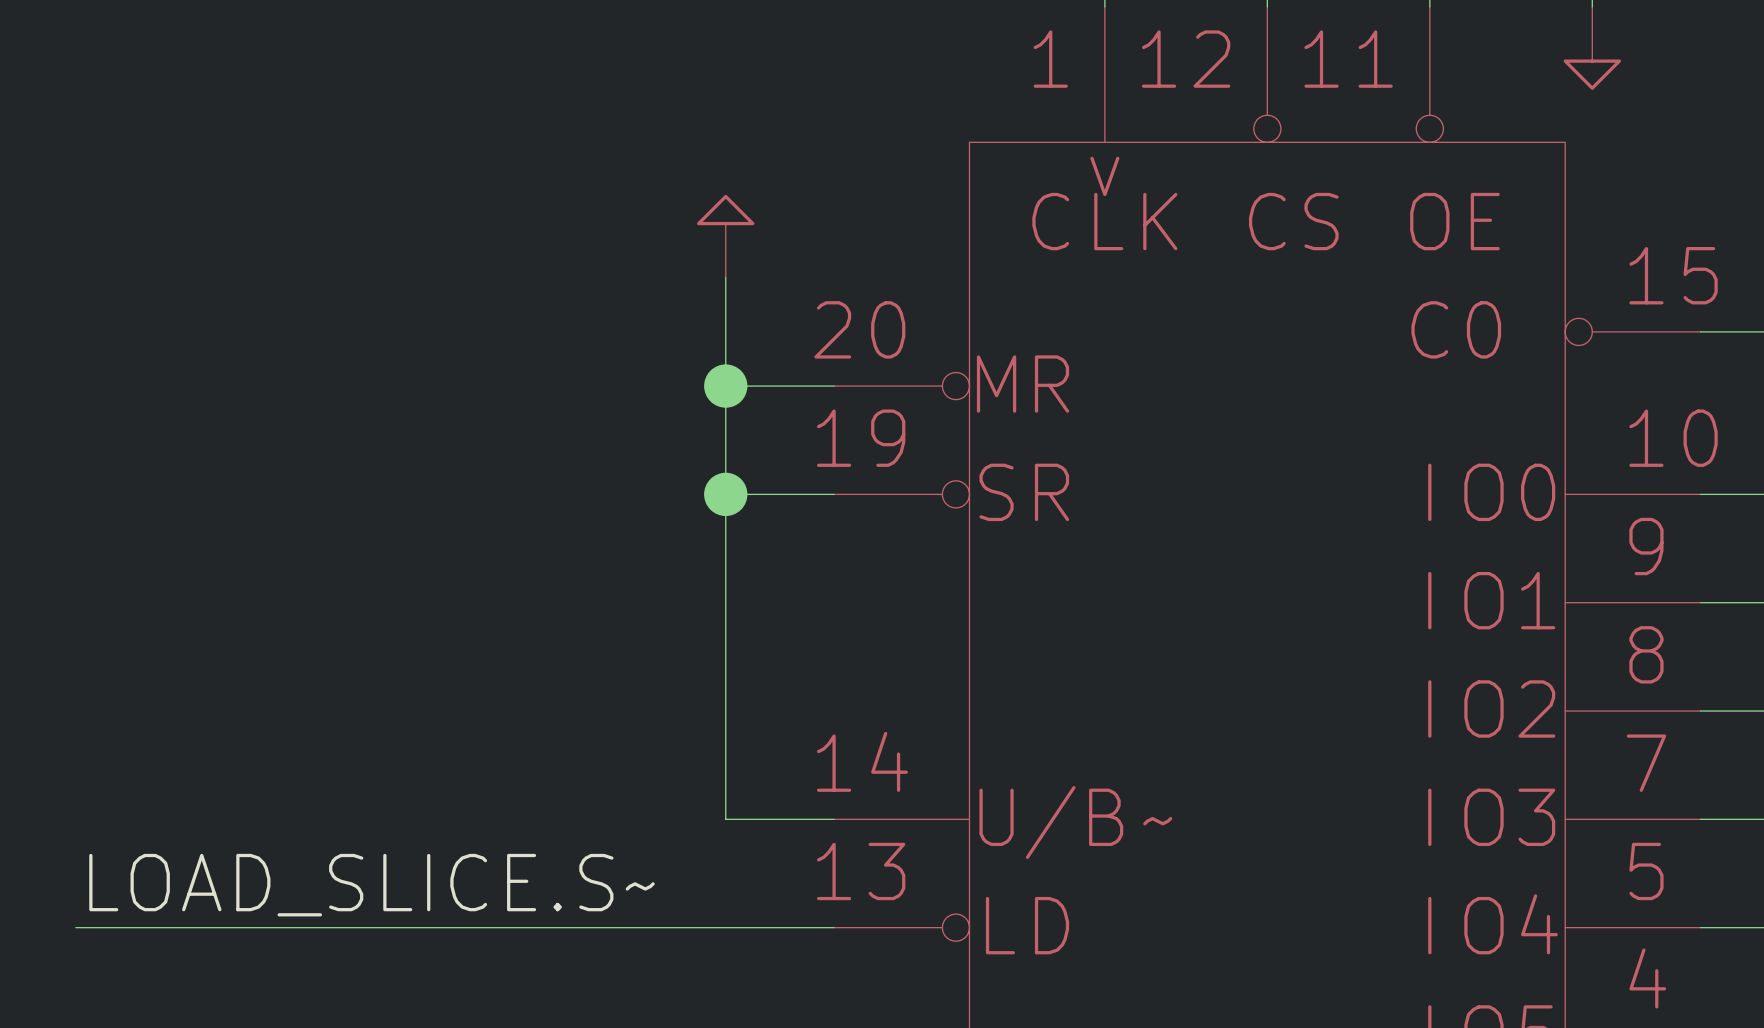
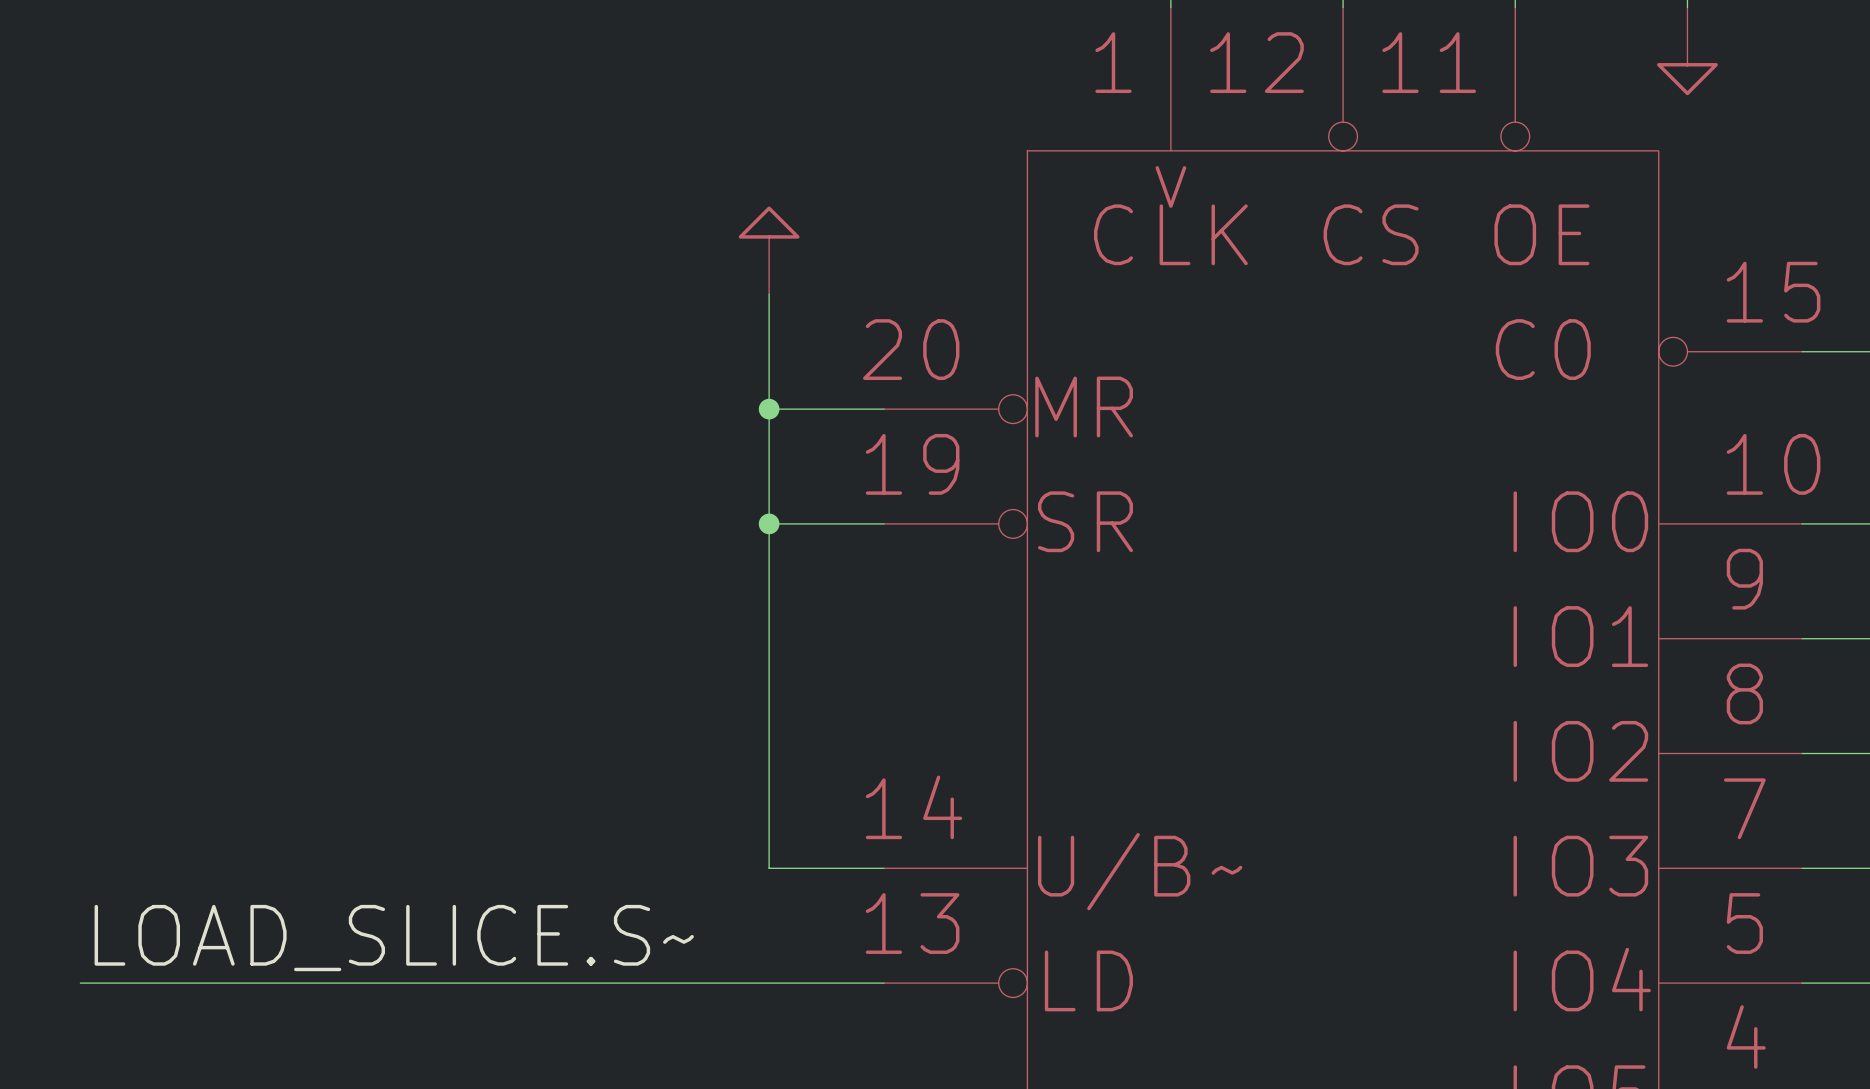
junction size: [704, 364, 748, 408] -> [758, 398, 780, 420]
junction size: [704, 472, 748, 517] -> [758, 513, 780, 535]

